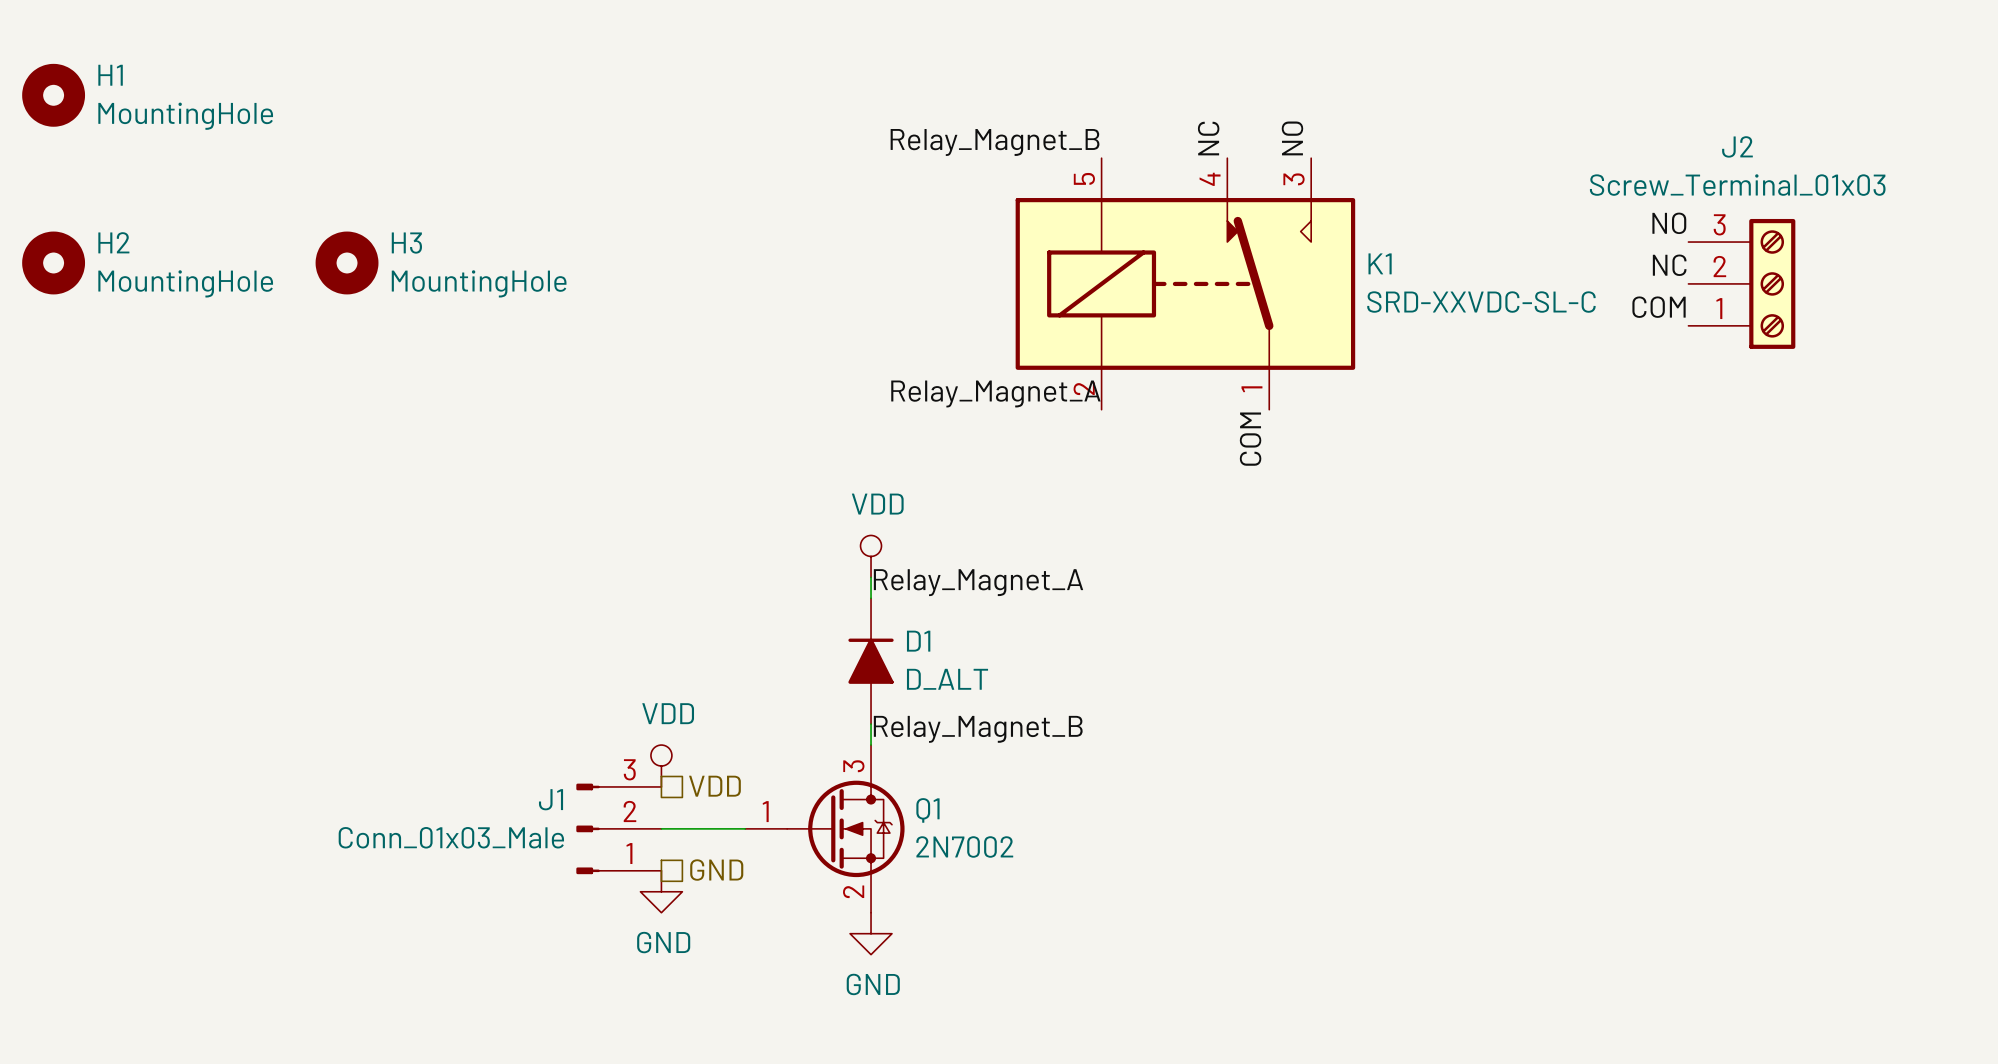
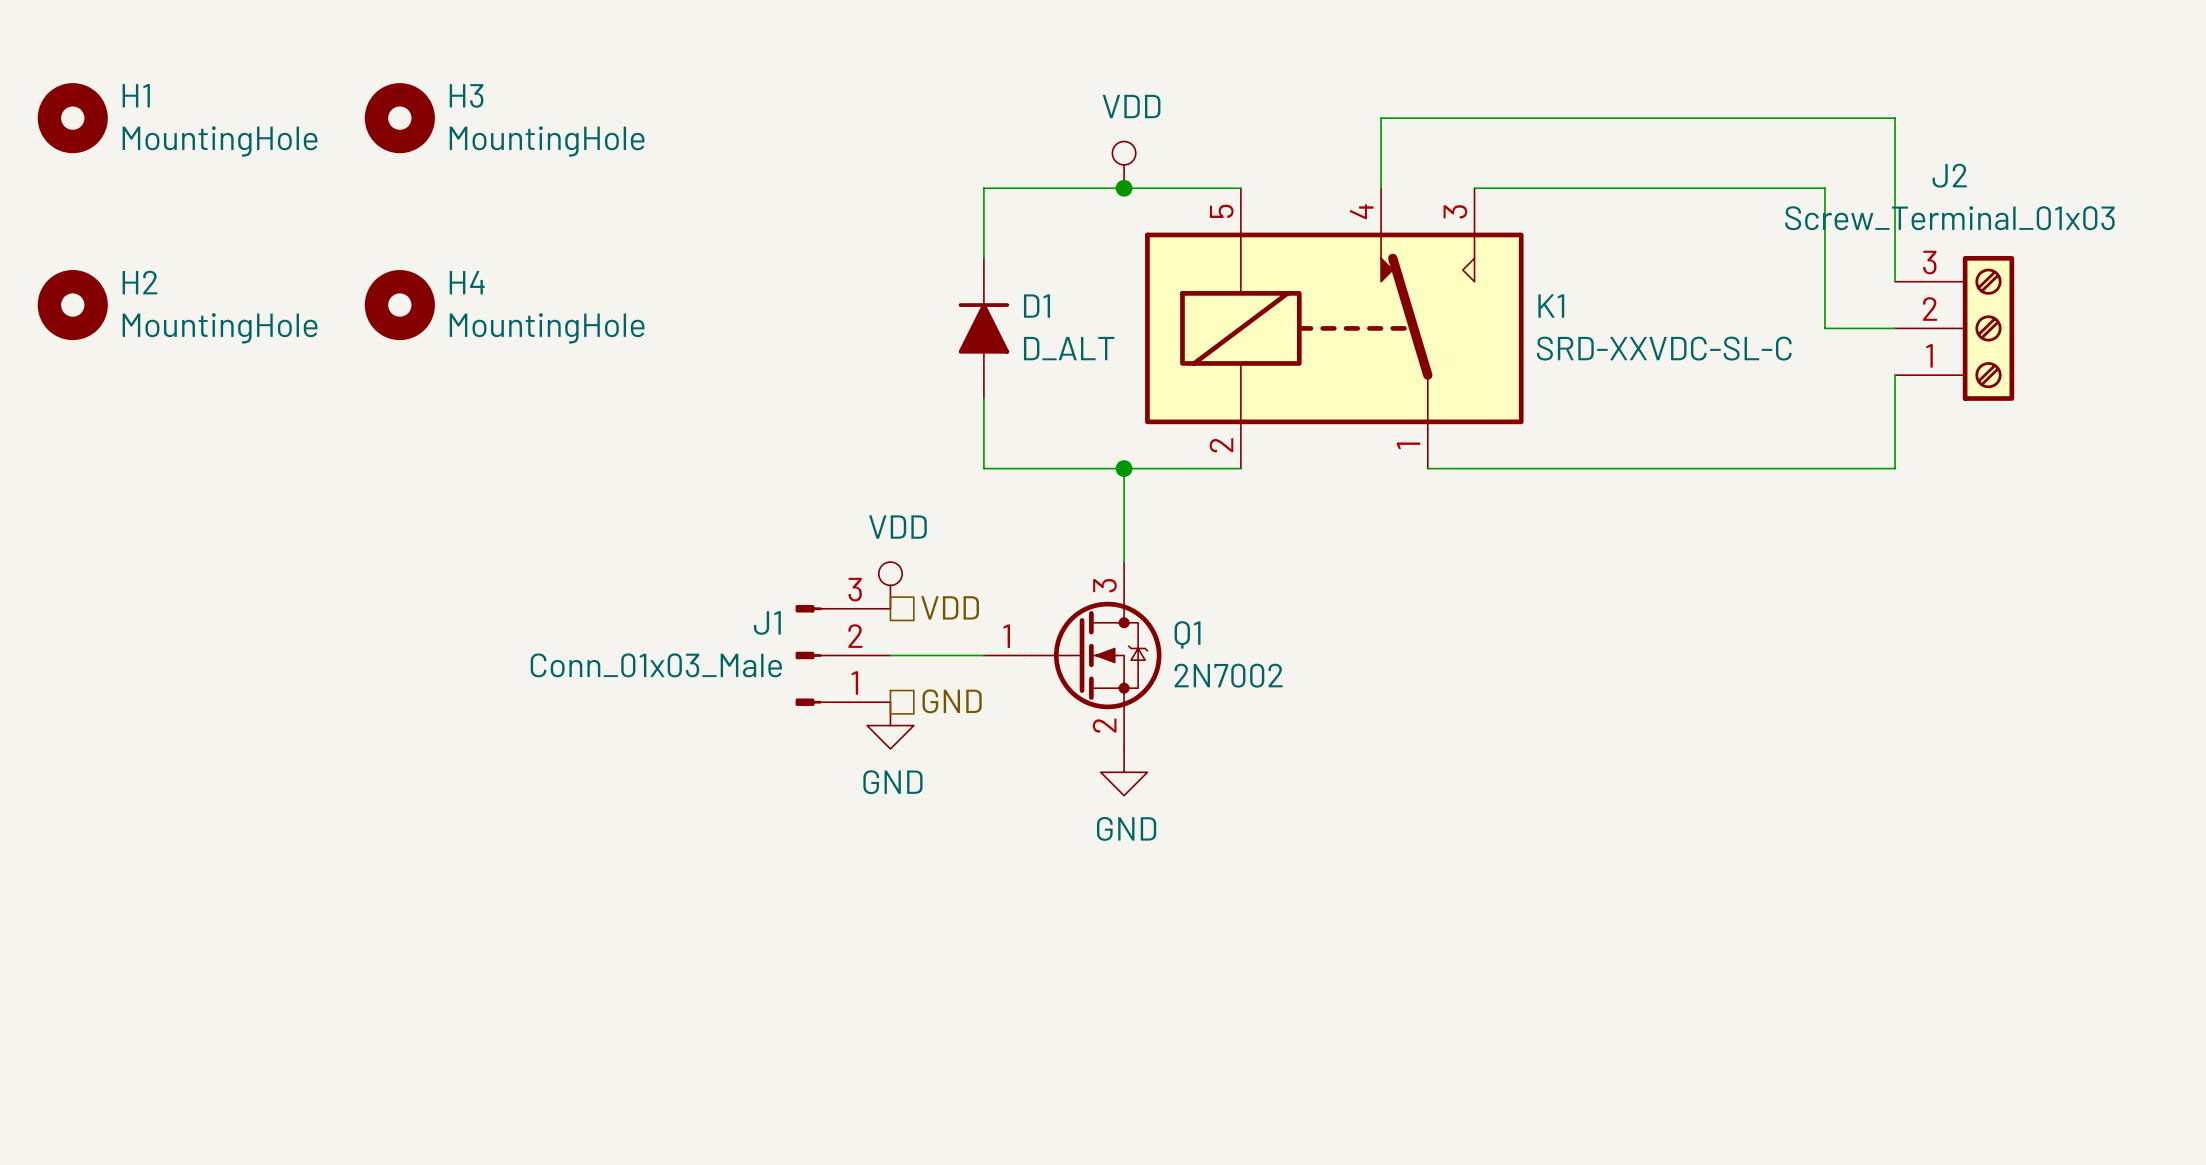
H3: none -> MountingHole (399, 118)
power symbol: none -> VDD (1124, 164)
label: NC (1208, 138) -> none
label: NO (1292, 138) -> none
label: Relay_Magnet_B (995, 142) -> none
junction: none -> (1124, 188)
wire: none -> (1240, 188) (983, 188) (983, 258)
wire: none -> (1381, 188) (1381, 118) (1895, 118) (1895, 281)
wire: none -> (1474, 188) (1824, 188) (1824, 328) (1895, 328)
label: NO (1669, 223) -> none
H3 name: H3 (406, 243) -> H4 (467, 282)
label: NC (1669, 265) -> none
label: COM (1659, 307) -> none
wire: none -> (1895, 375) (1895, 468) (1427, 468)
wire: none -> (983, 398) (983, 468) (1240, 468)
label: Relay_Magnet_A (995, 393) -> none
wire: none -> (1124, 468) (1124, 562)
junction: none -> (1124, 468)
label: COM (1250, 439) -> none
power symbol position: VDD (871, 556) -> VDD (890, 585)
wire: (871, 577) (871, 598) -> (983, 655) (890, 655)
label: Relay_Magnet_A (978, 582) -> none
power symbol: none -> GND (890, 725)
D1 position: (871, 661) -> (983, 328)
power symbol: none -> GND (1124, 772)
wire: (871, 724) (871, 745) -> none
label: Relay_Magnet_B (978, 729) -> none
power symbol: VDD (661, 766) -> none
hierarchical label position: VDD (714, 786) -> VDD (950, 607)
J1 position: (618, 828) -> (843, 655)
wire: (661, 828) (745, 828) -> none
Q1 position: (824, 828) -> (1072, 655)
hierarchical label position: GND (716, 870) -> GND (952, 701)
power symbol: GND (661, 891) -> none
power symbol: GND (871, 933) -> none

